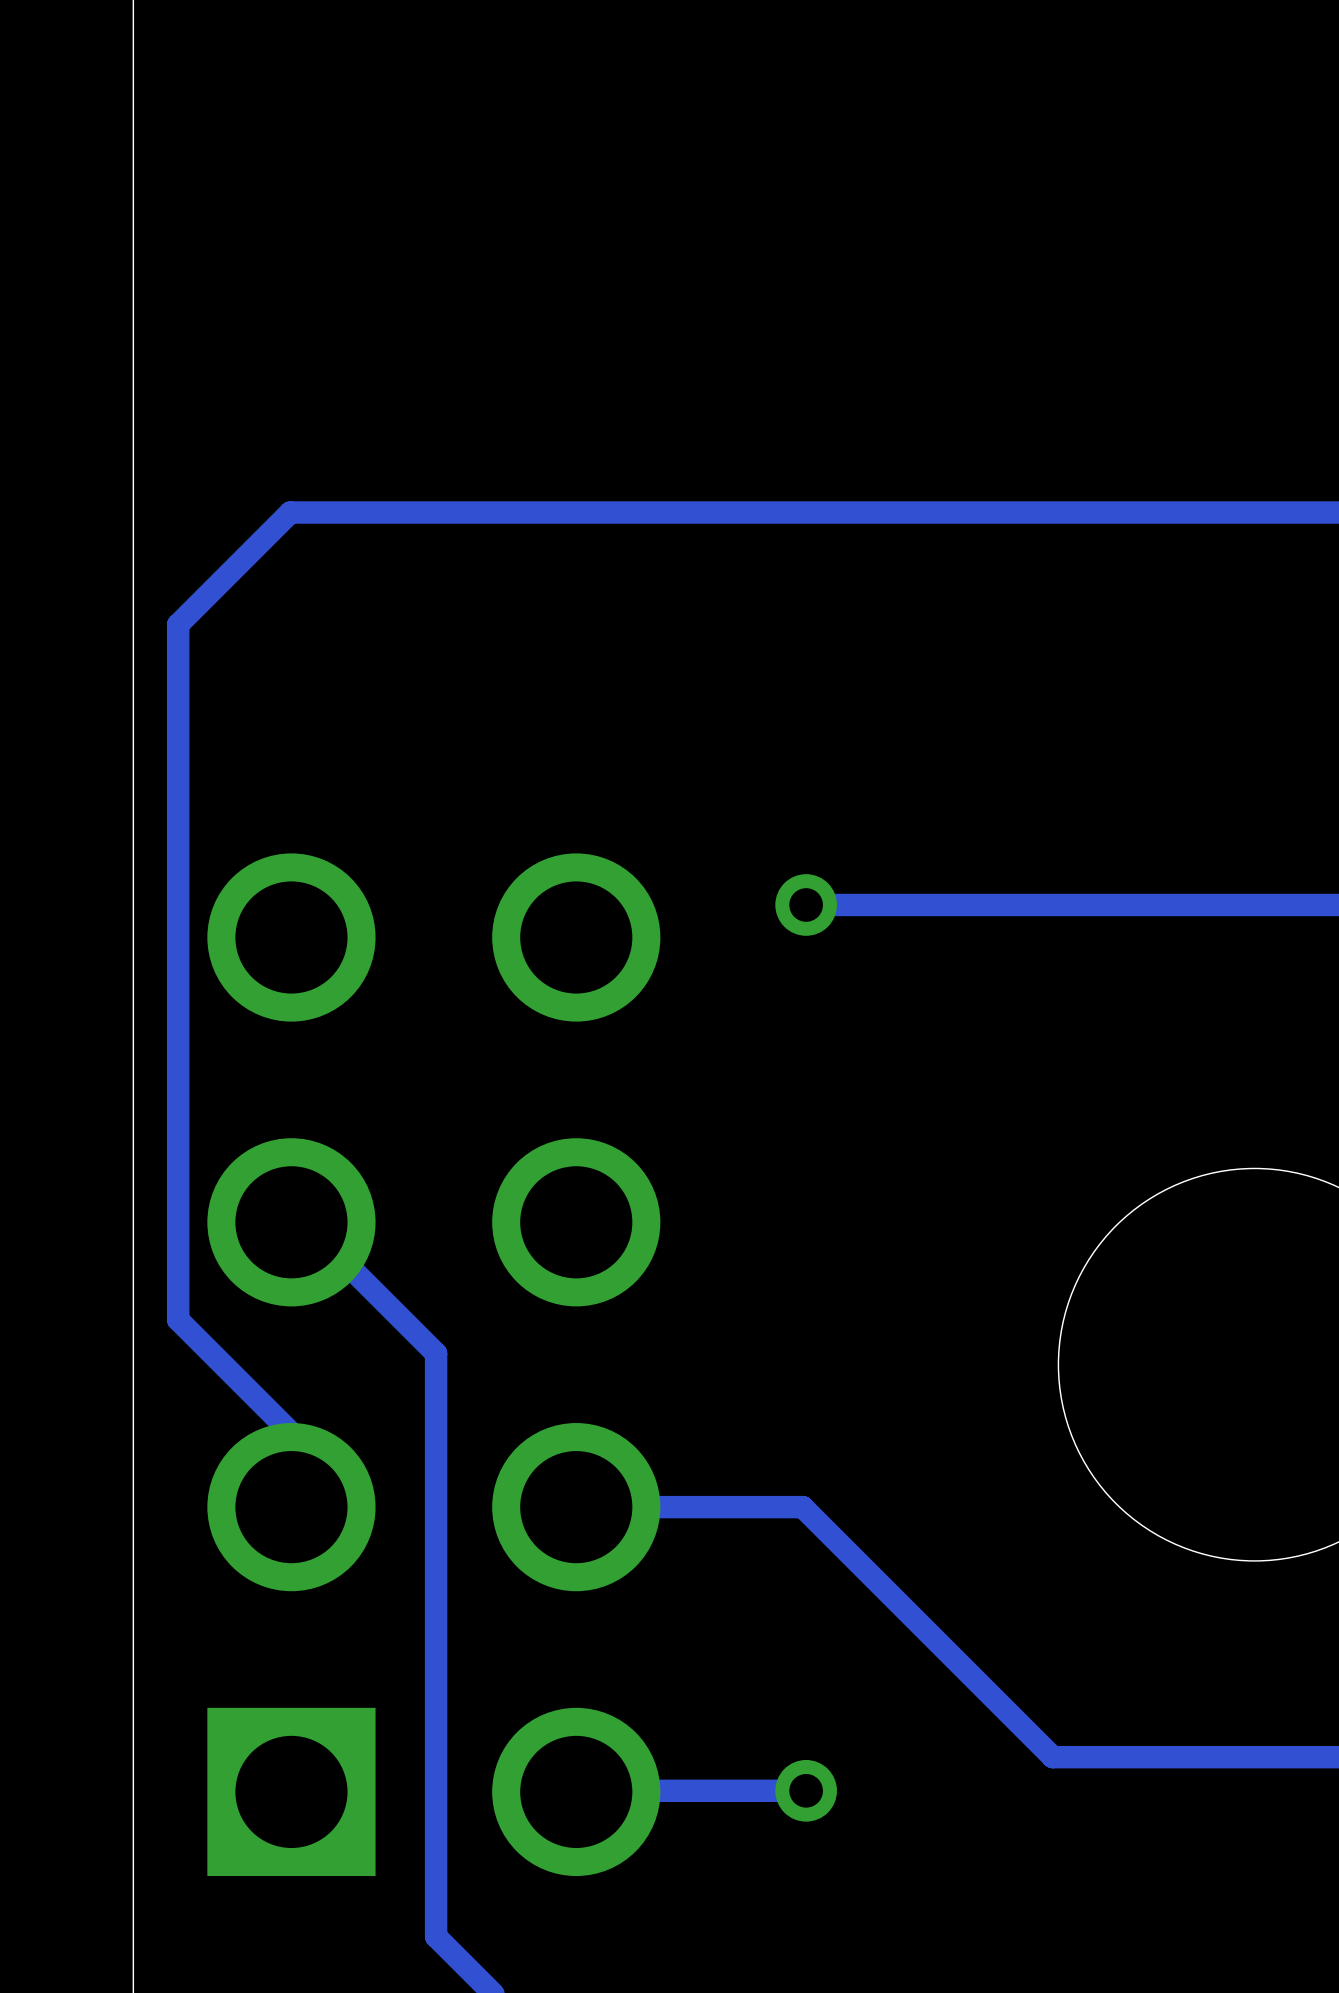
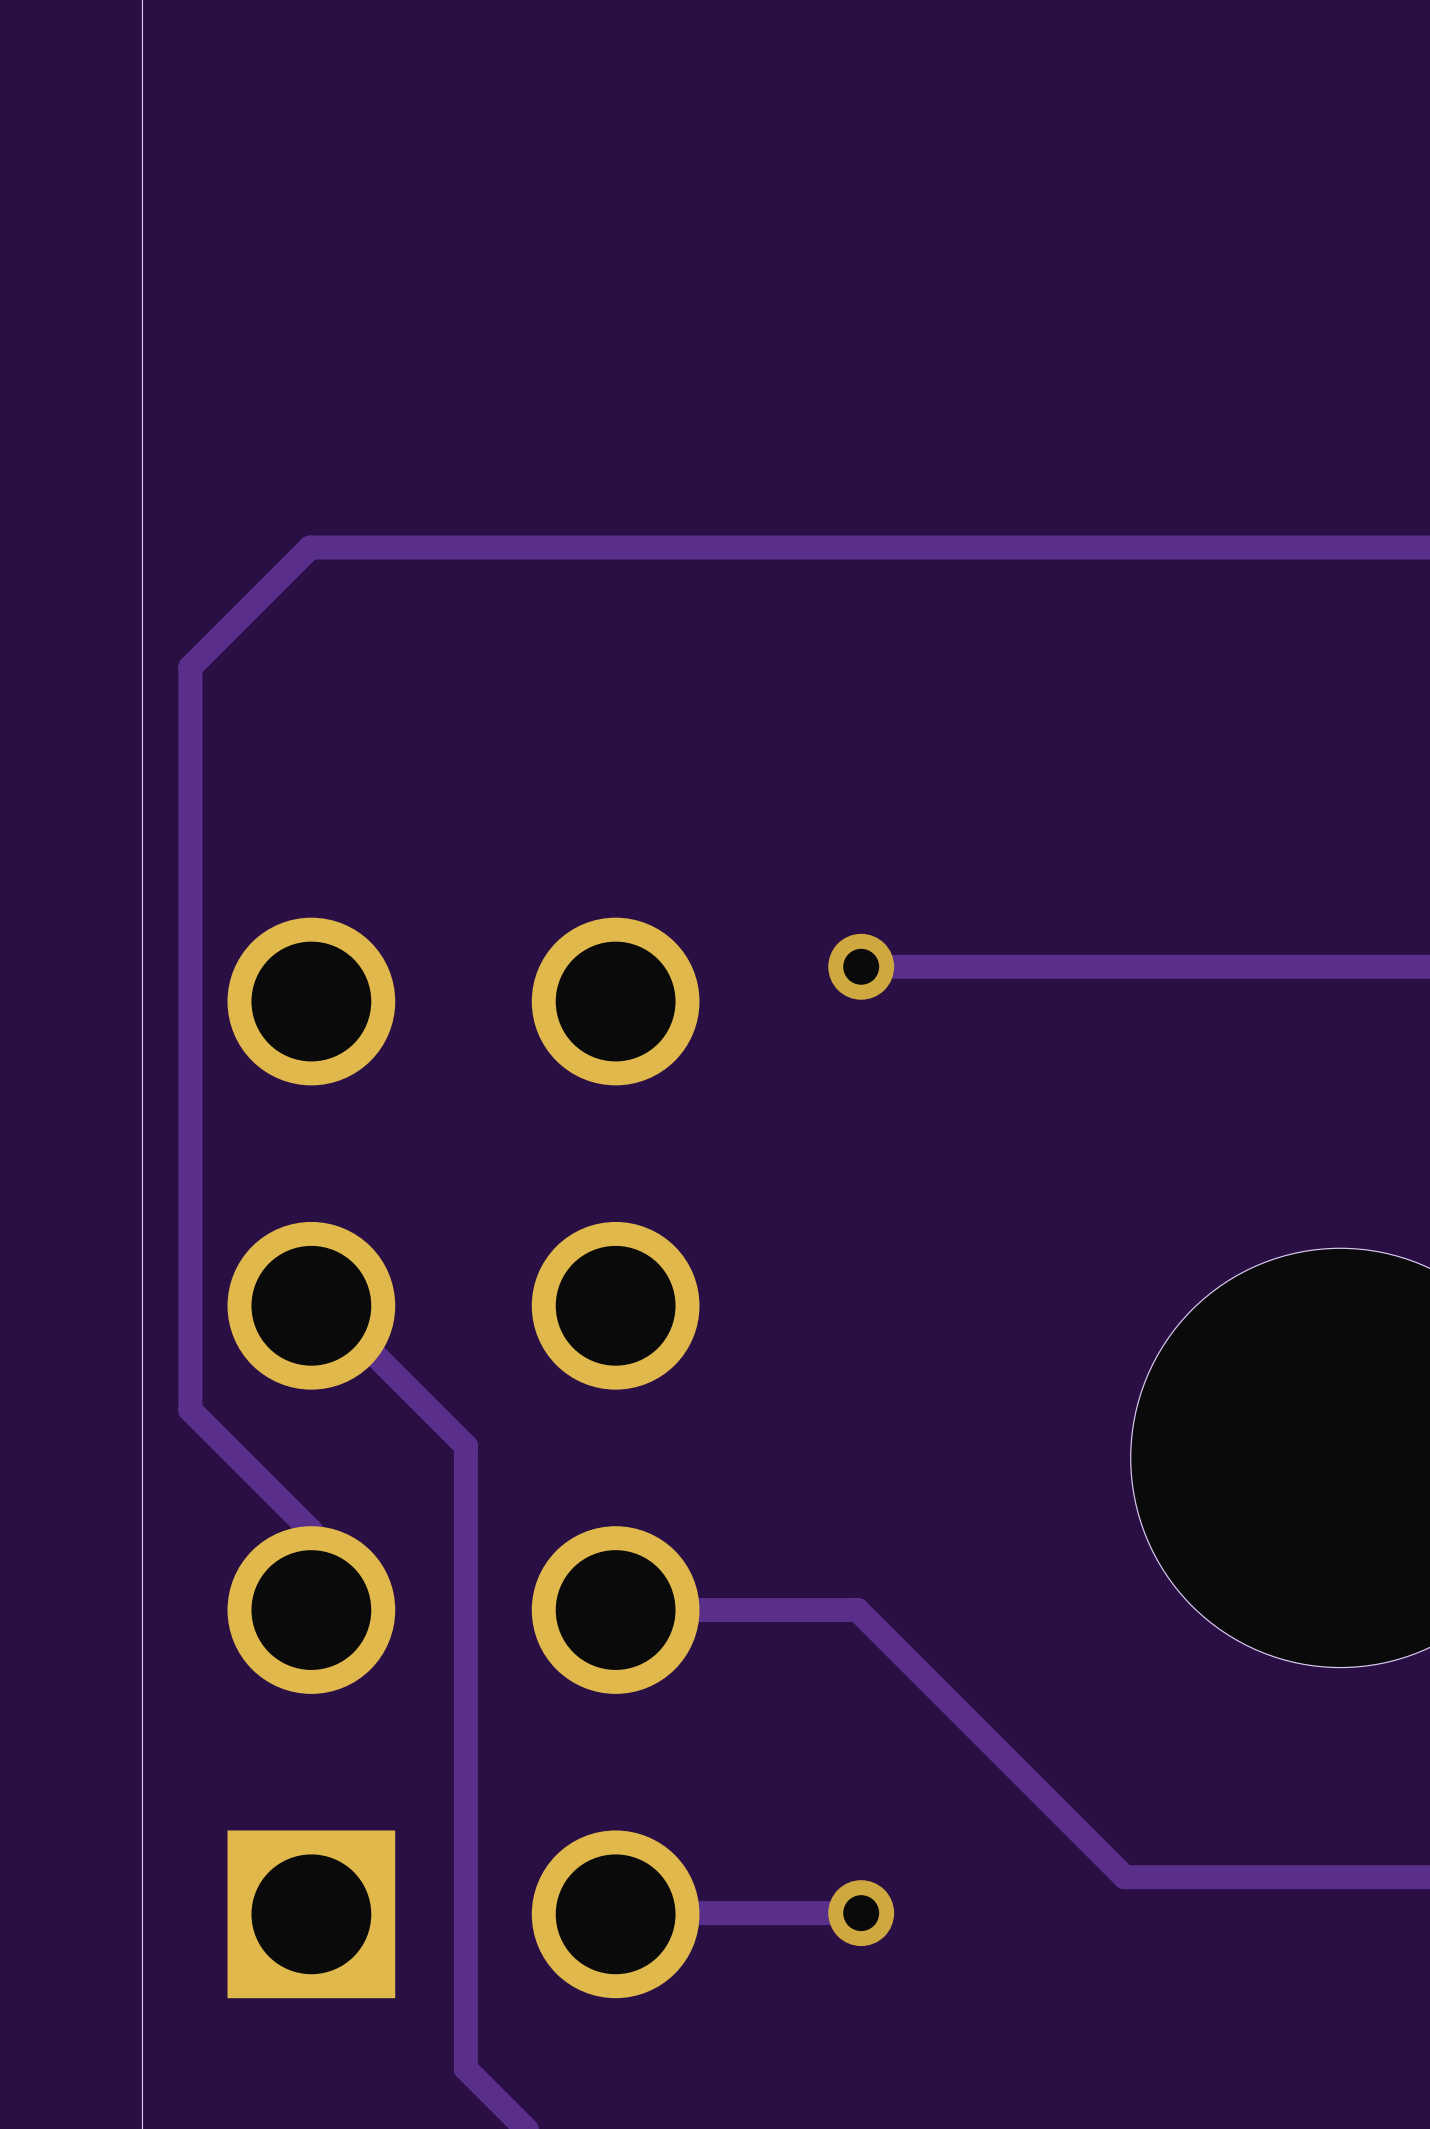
part footprint: [207, 853, 661, 1877] -> [227, 917, 700, 1999]

